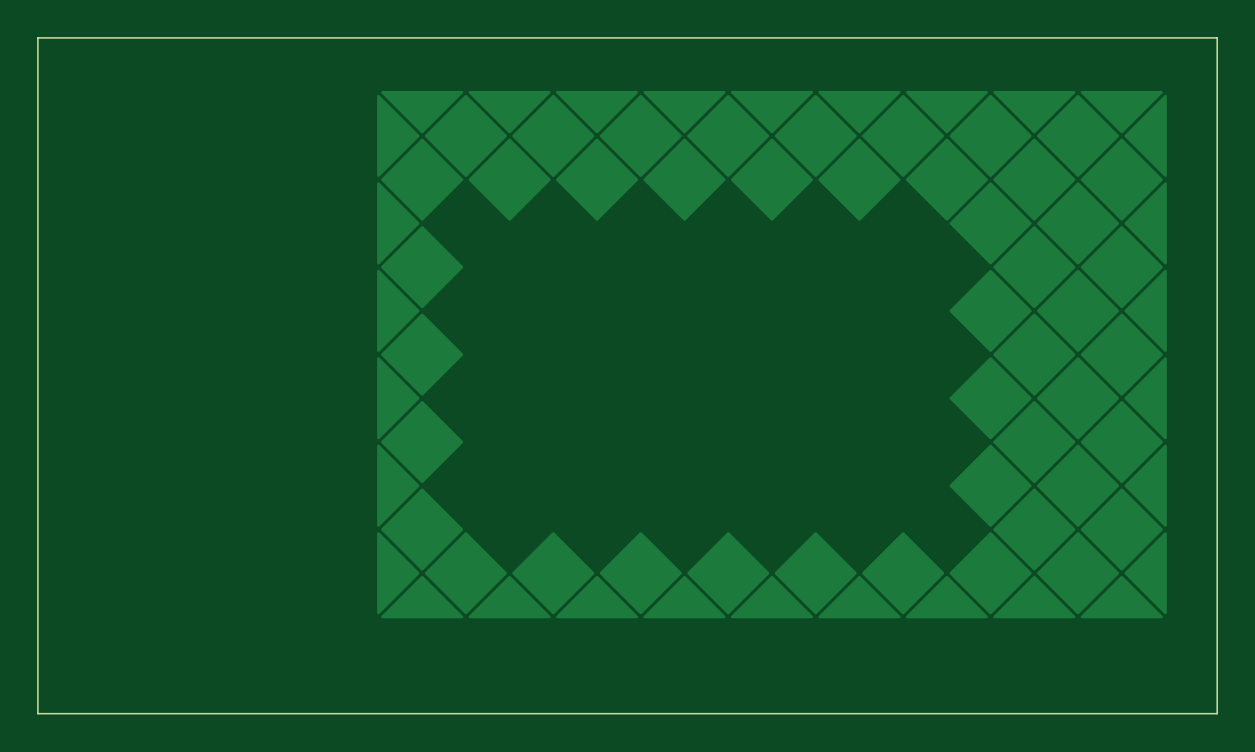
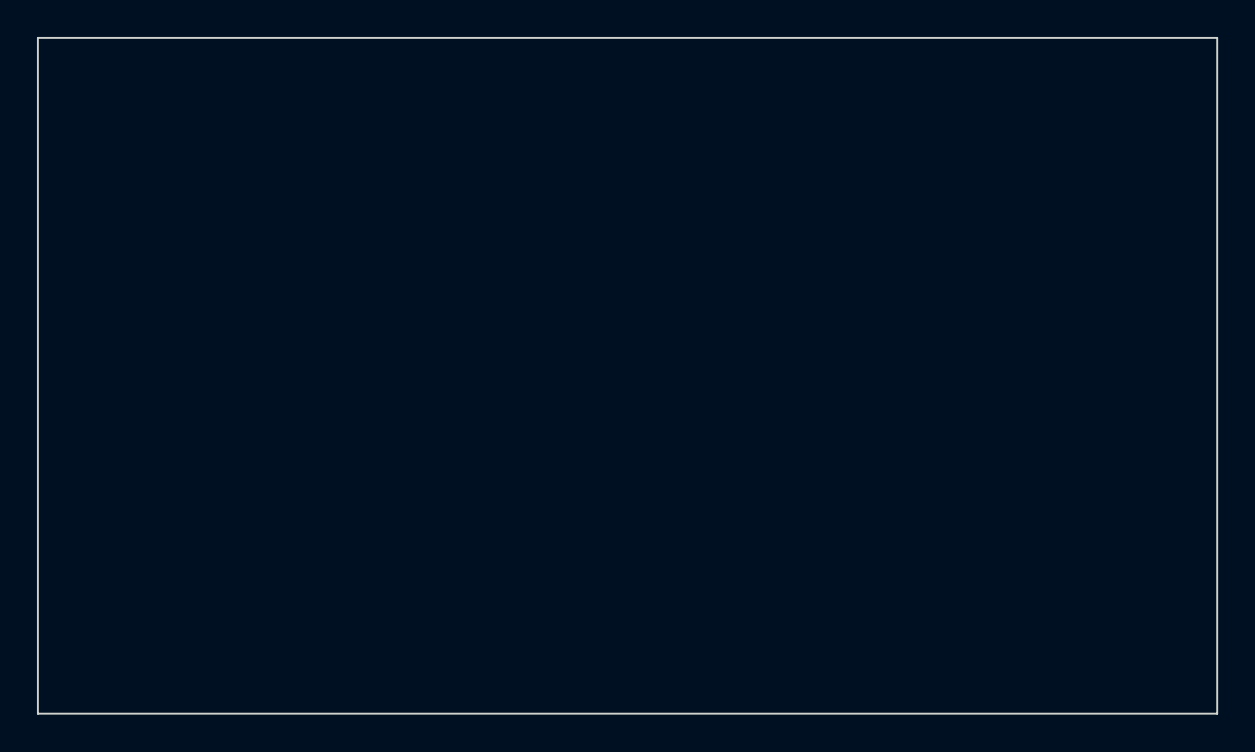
drawing: [377, 90, 1167, 619] -> none

